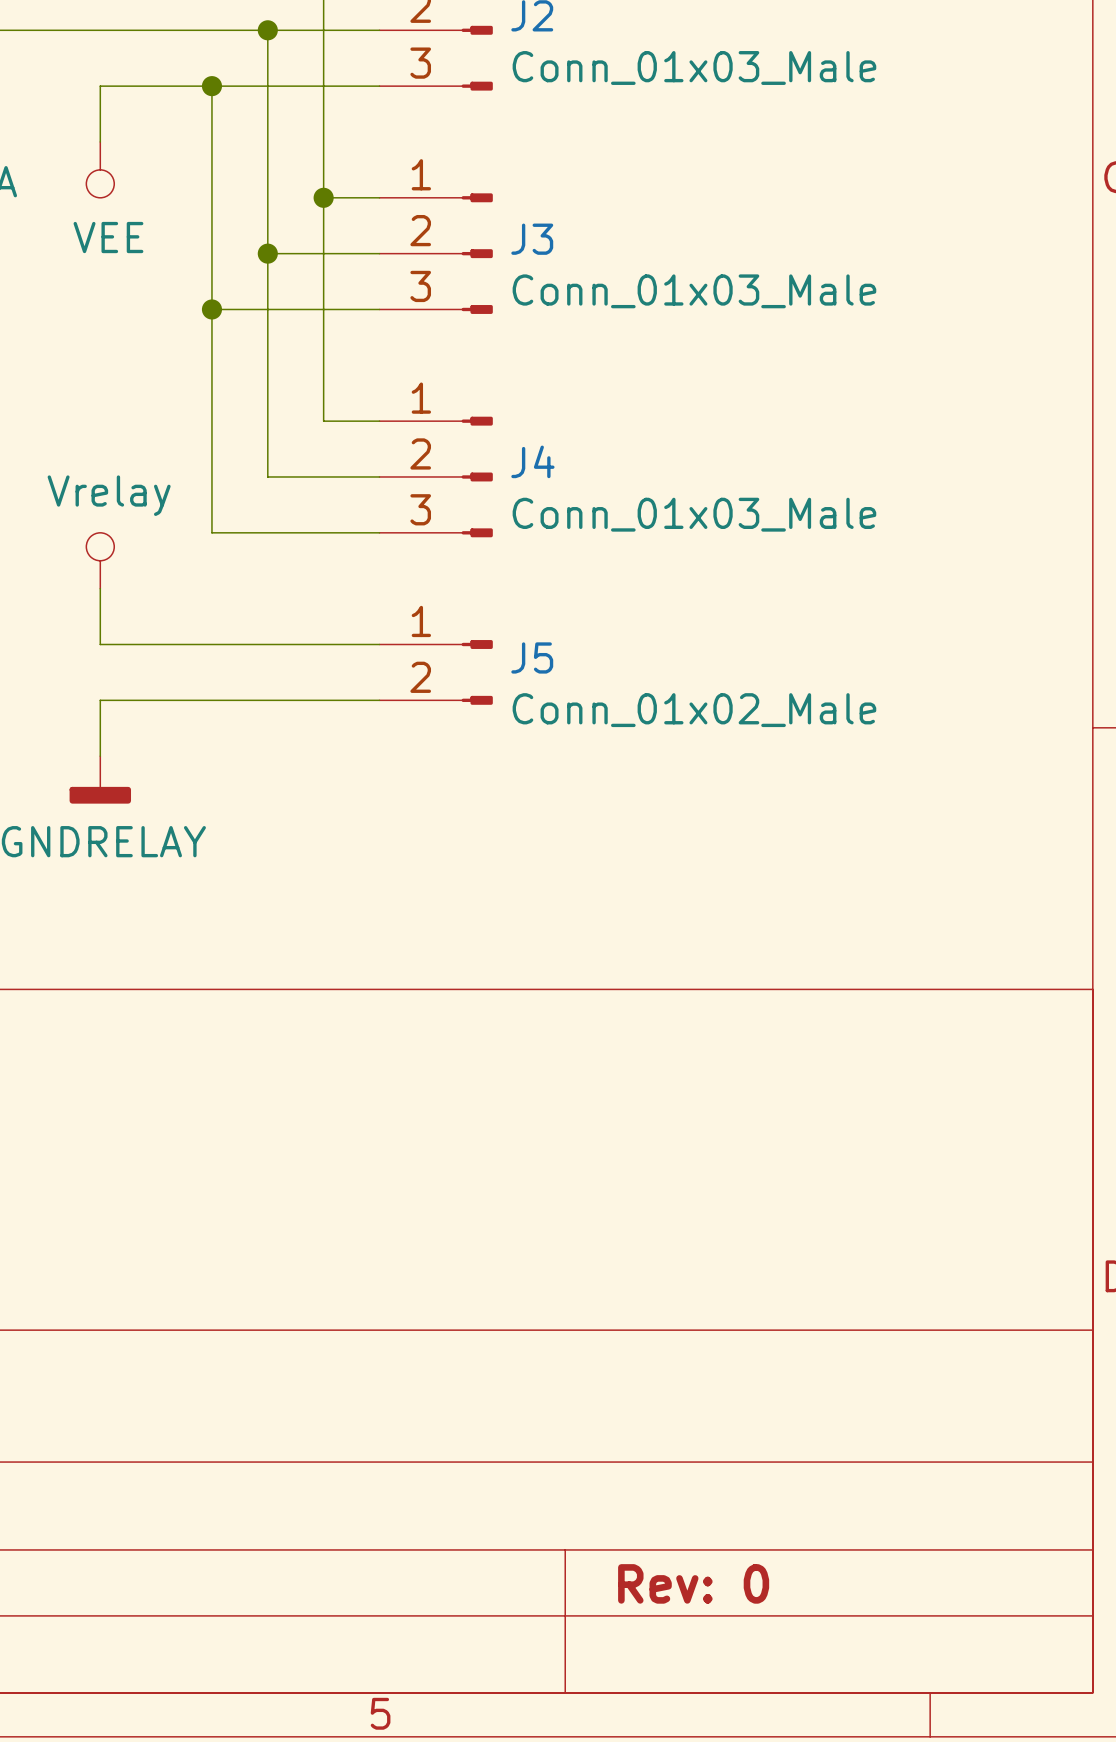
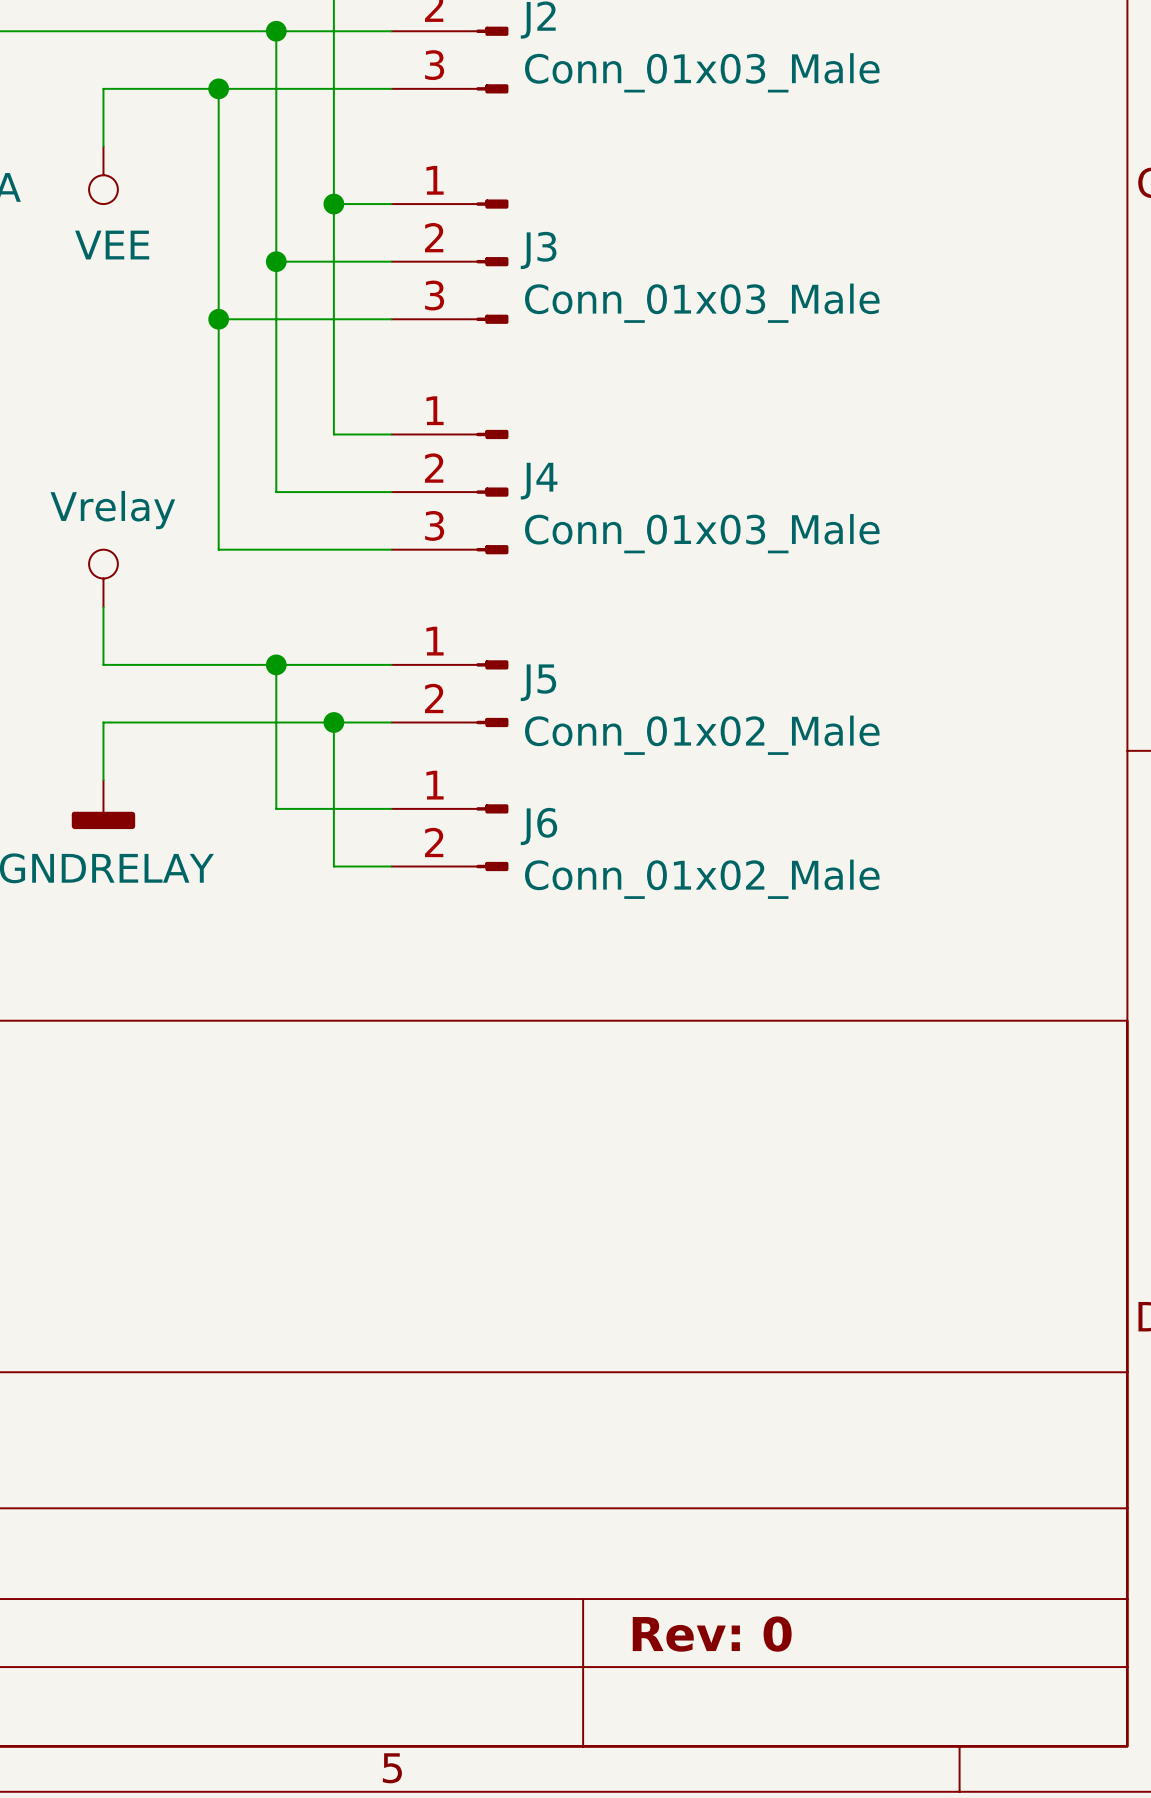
wire: none -> (276, 664) (276, 808) (391, 808)
junction: none -> (276, 664)
wire: none -> (333, 722) (333, 866) (391, 866)
junction: none -> (333, 722)
J6: none -> Conn_01x02_Male (449, 837)

